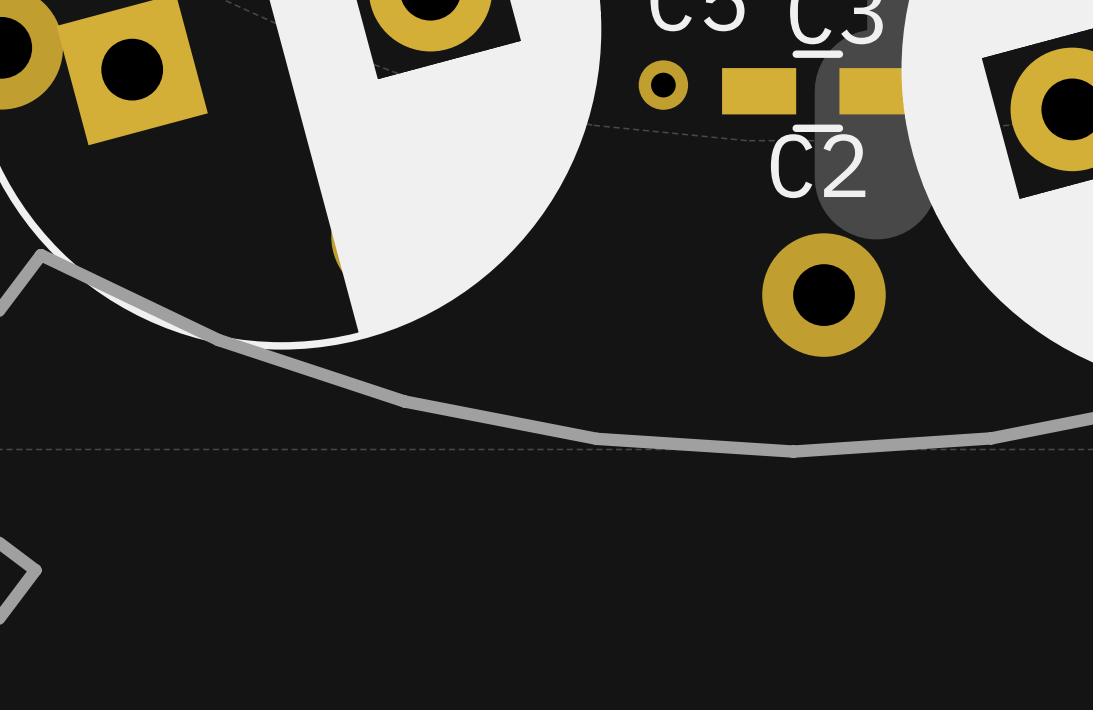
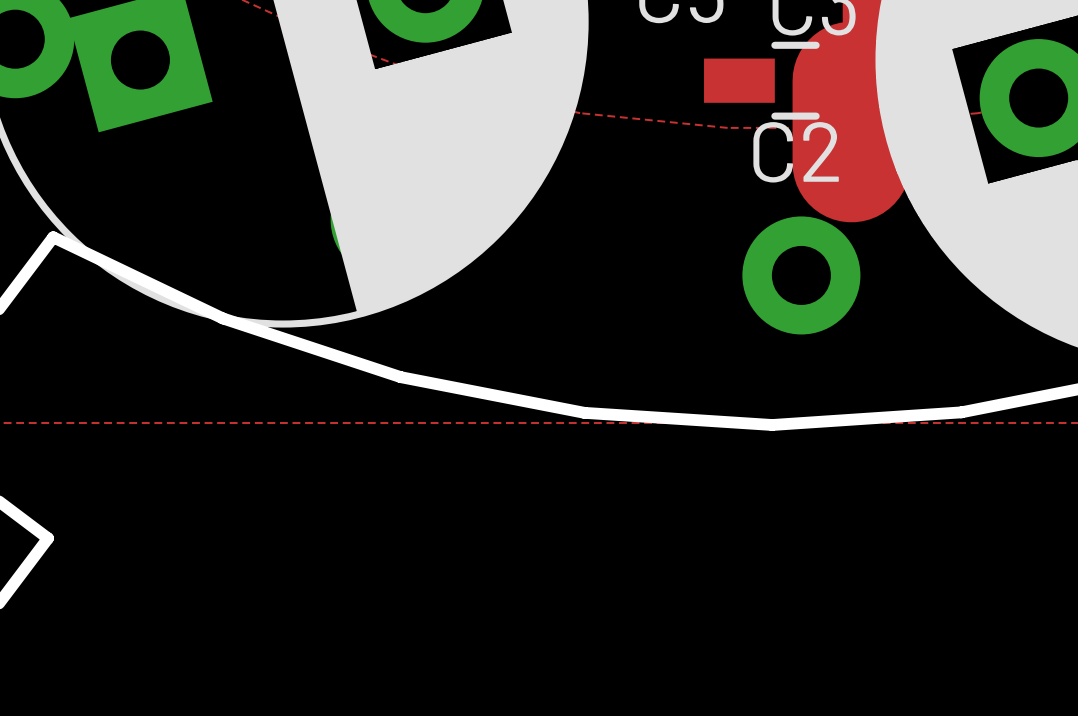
via: (663, 85) -> none

